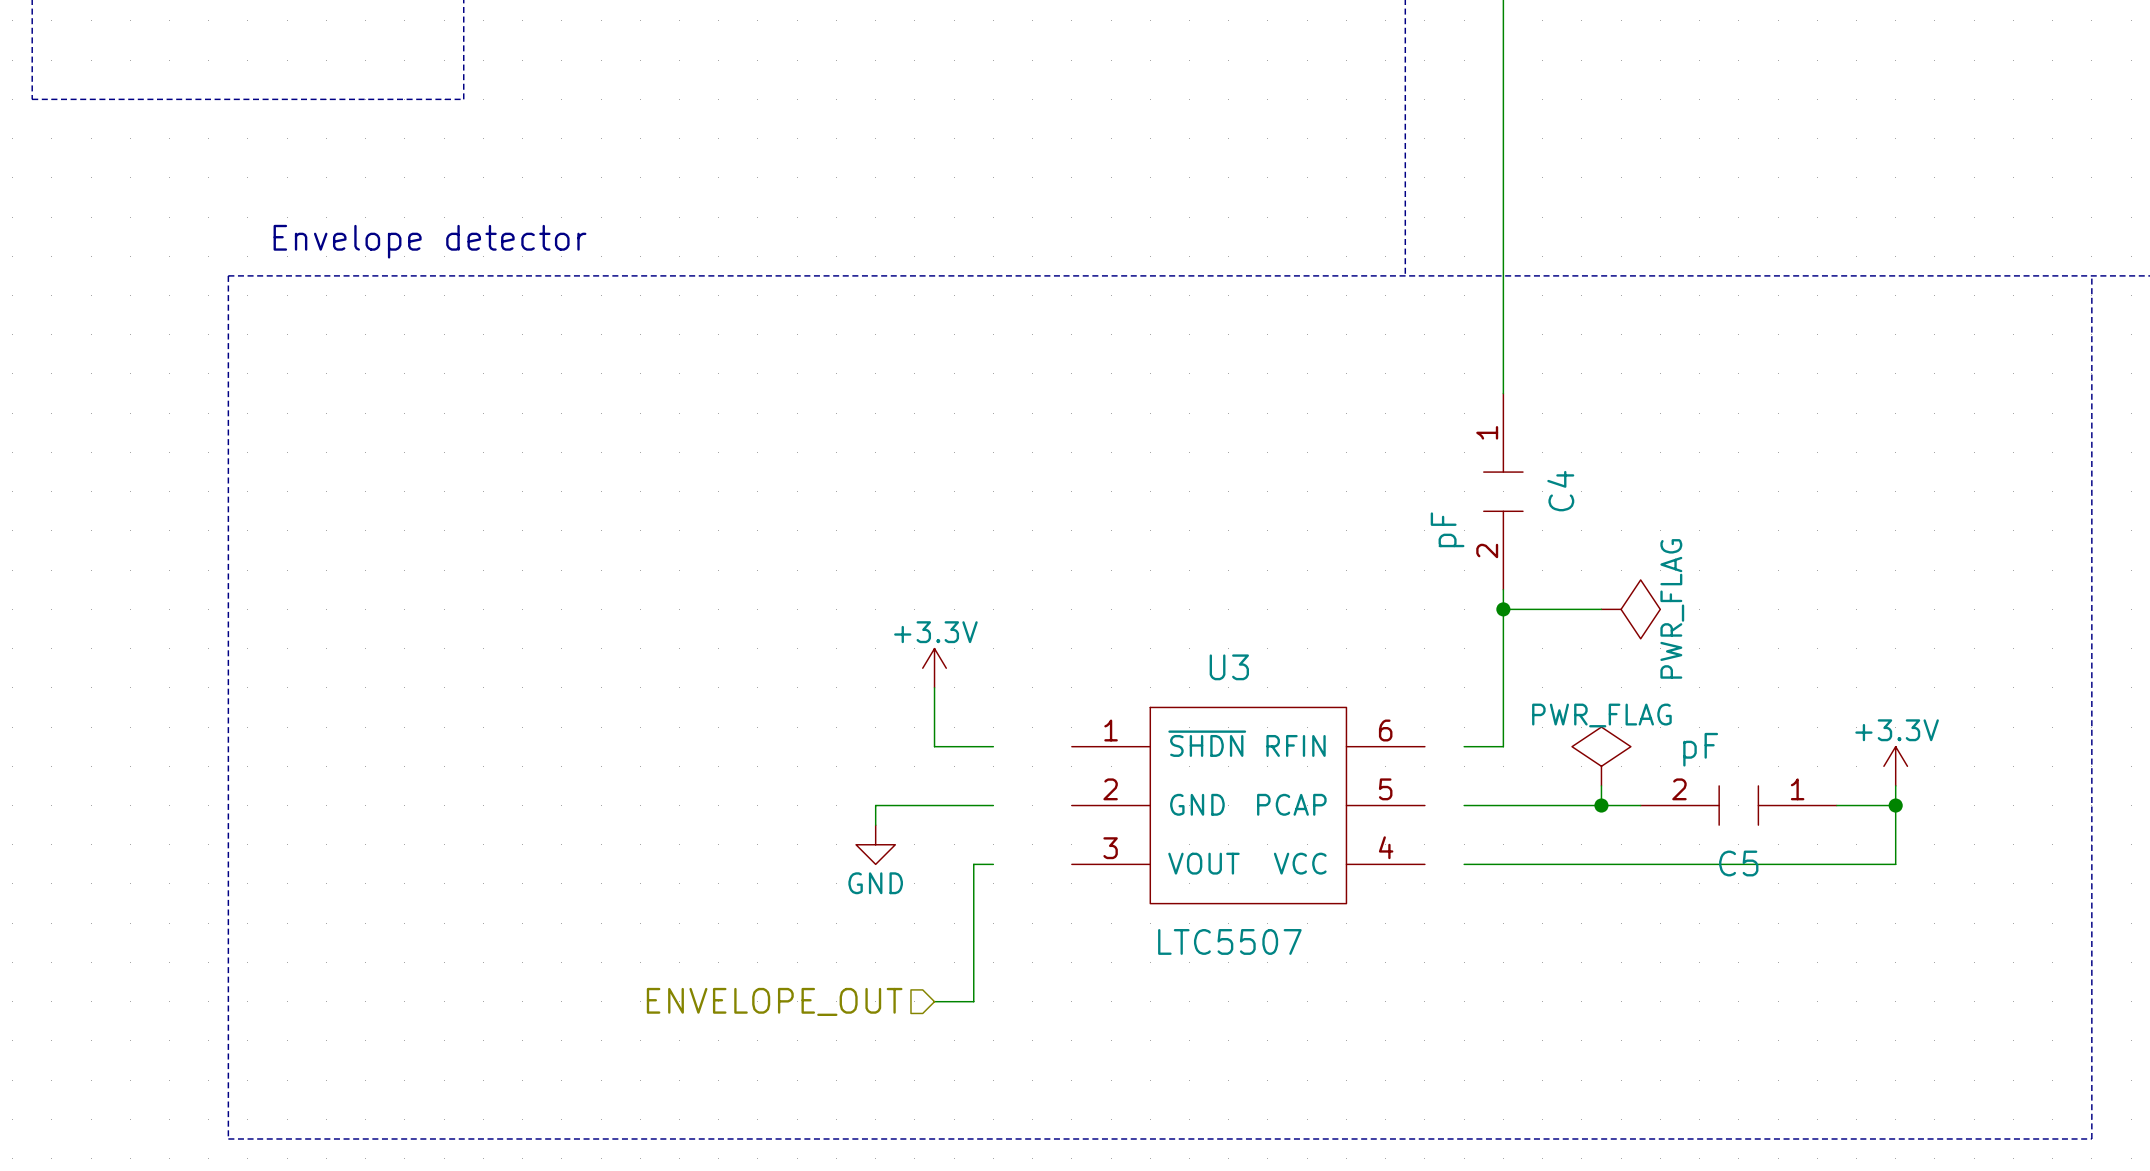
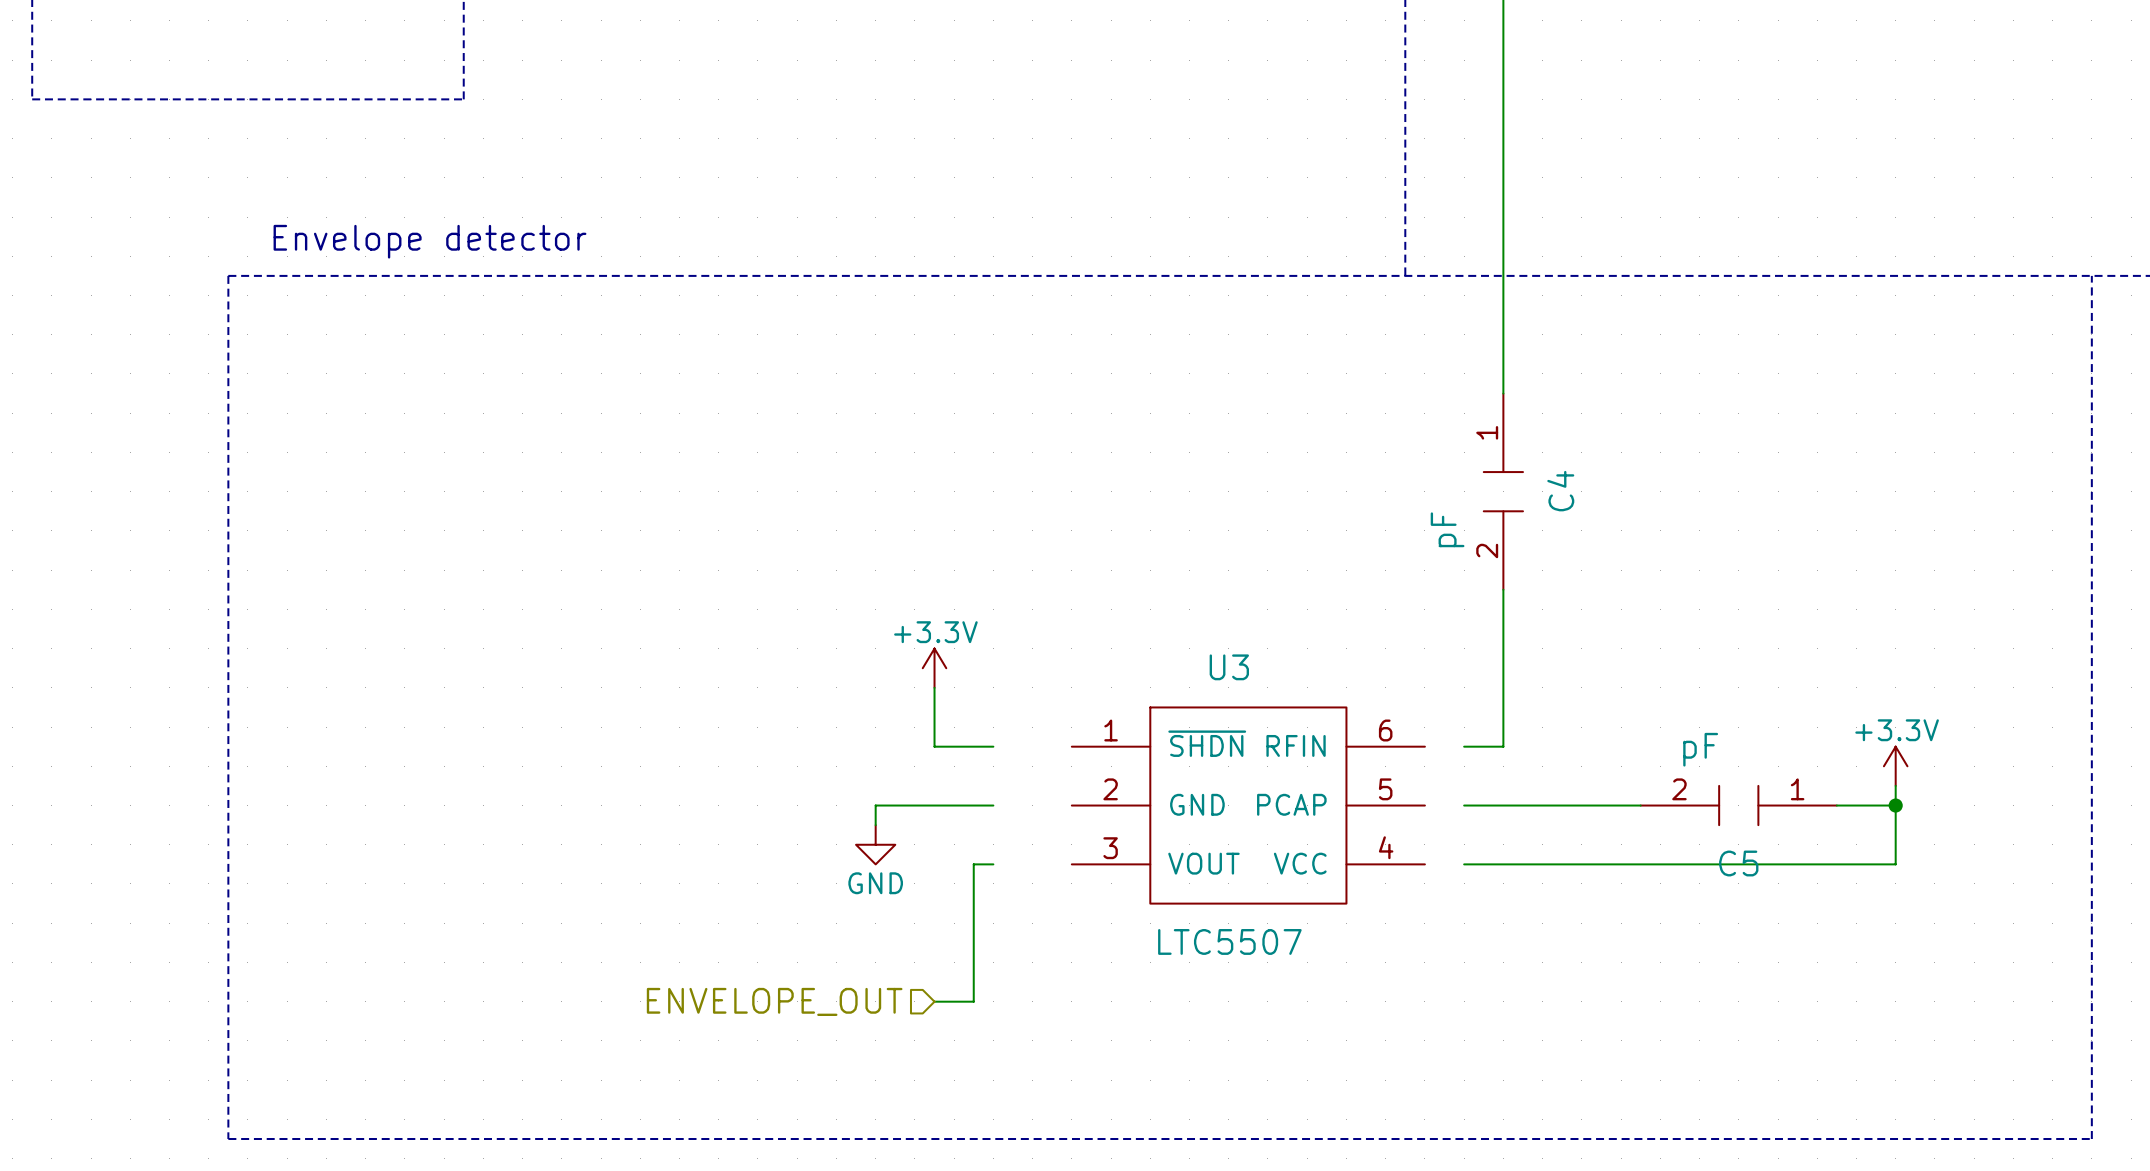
wire: (1503, 609) (1601, 609) -> none
junction: (1503, 609) -> none
power symbol: PWR_FLAG (1630, 609) -> none
power symbol: PWR_FLAG (1601, 756) -> none
wire: (1601, 785) (1601, 805) -> none
junction: (1601, 805) -> none

